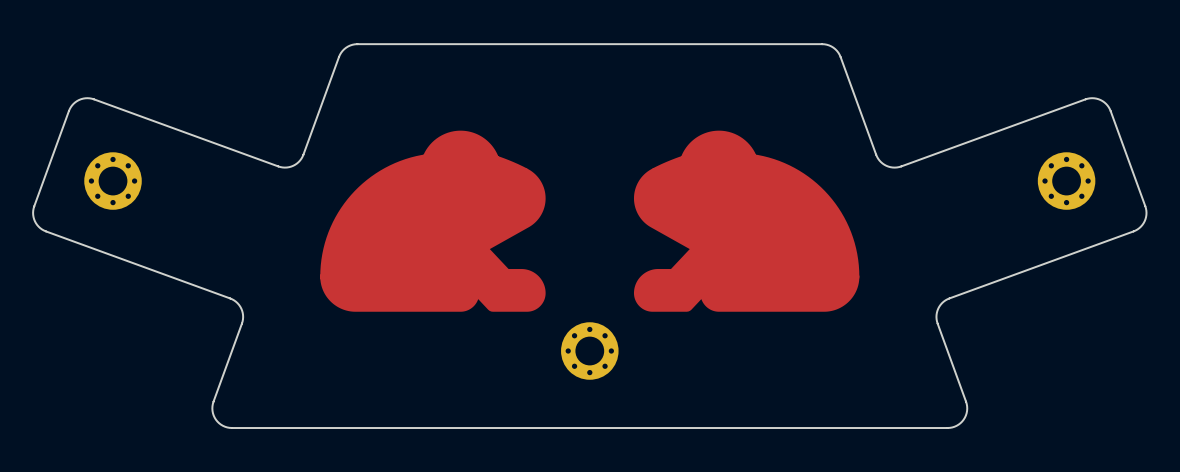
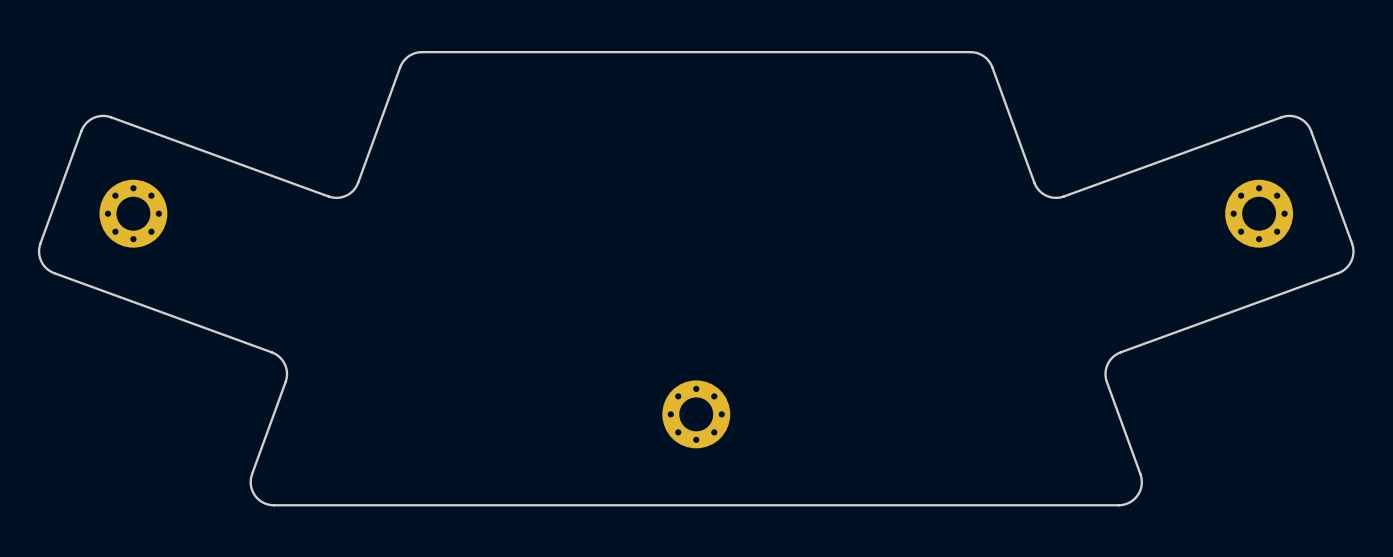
drawing: [320, 130, 860, 312] -> none

